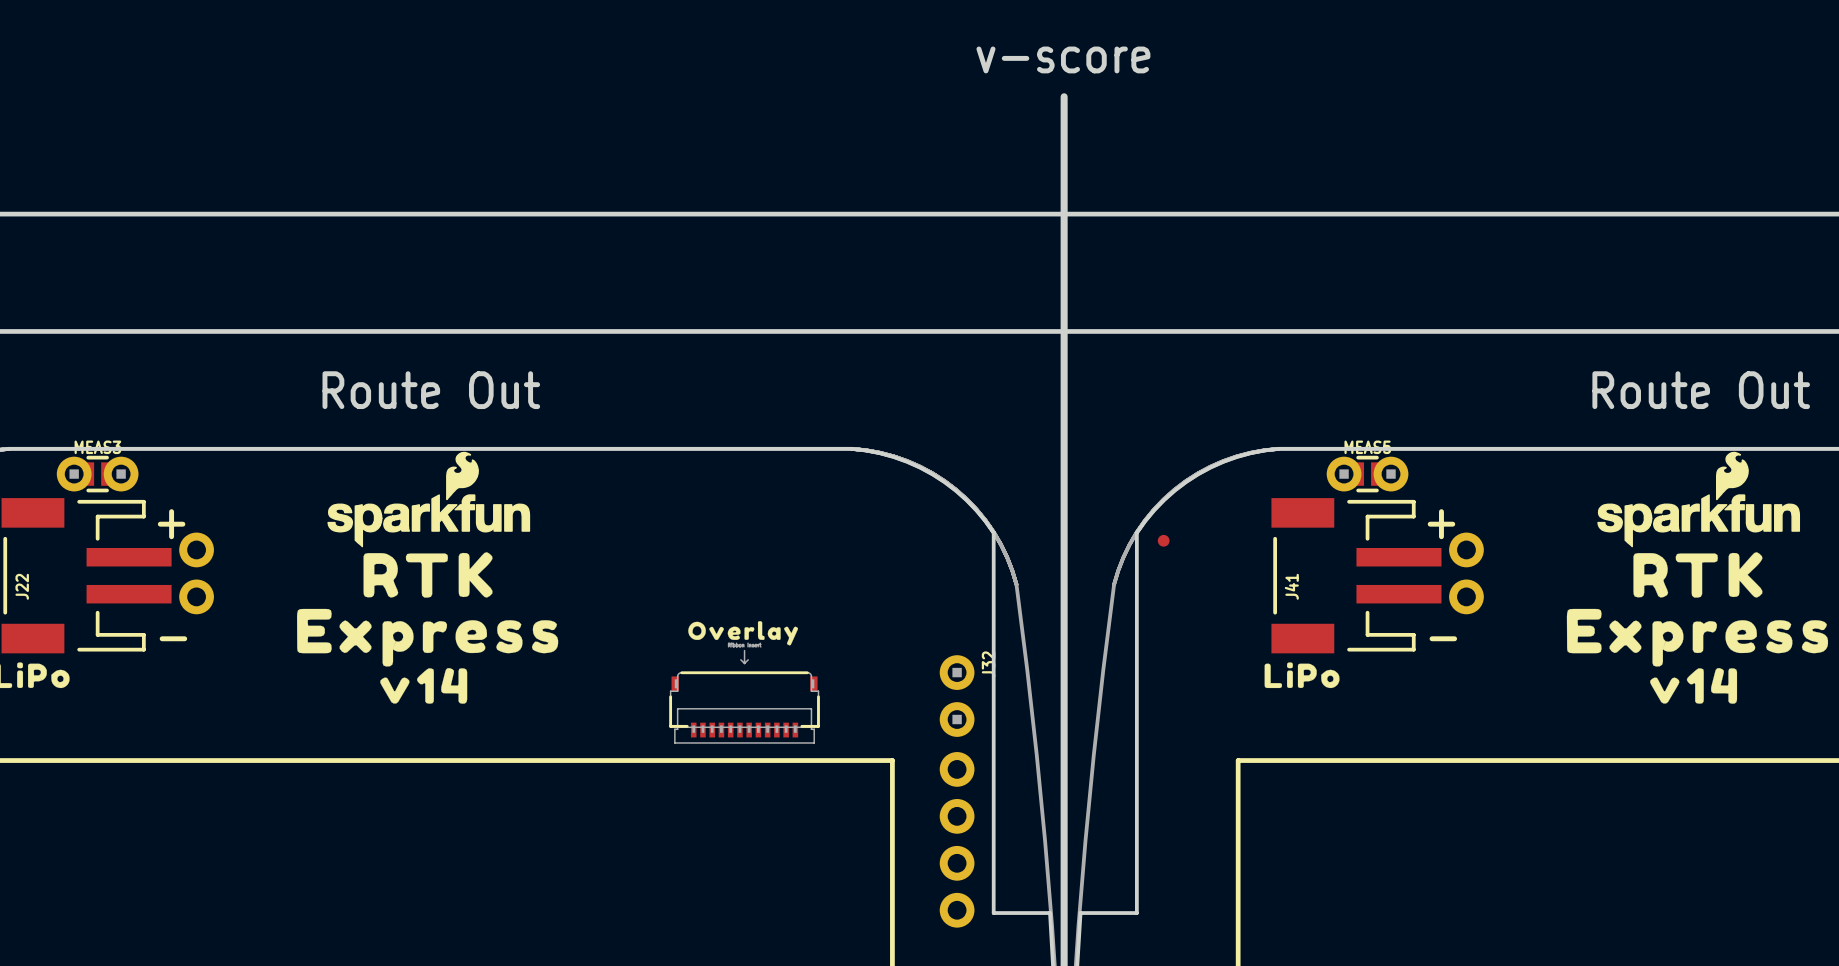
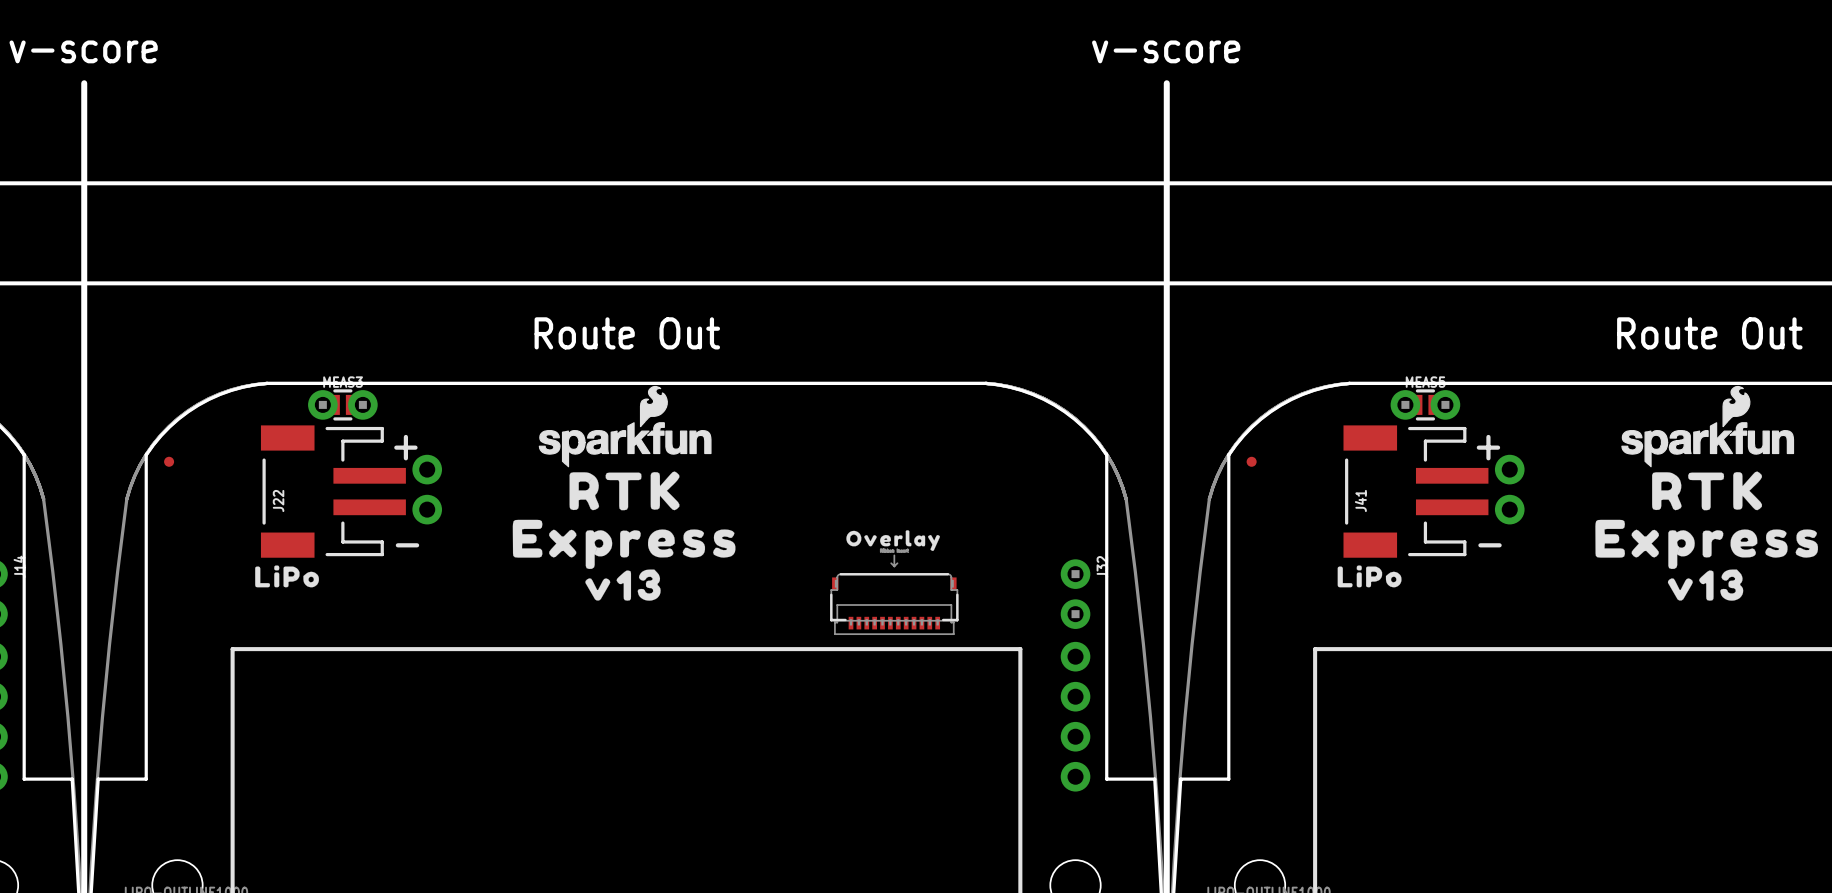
drawing shape: [380, 668, 468, 704] -> [585, 569, 661, 601]
drawing shape: [1650, 668, 1738, 704] -> [1667, 569, 1744, 601]

